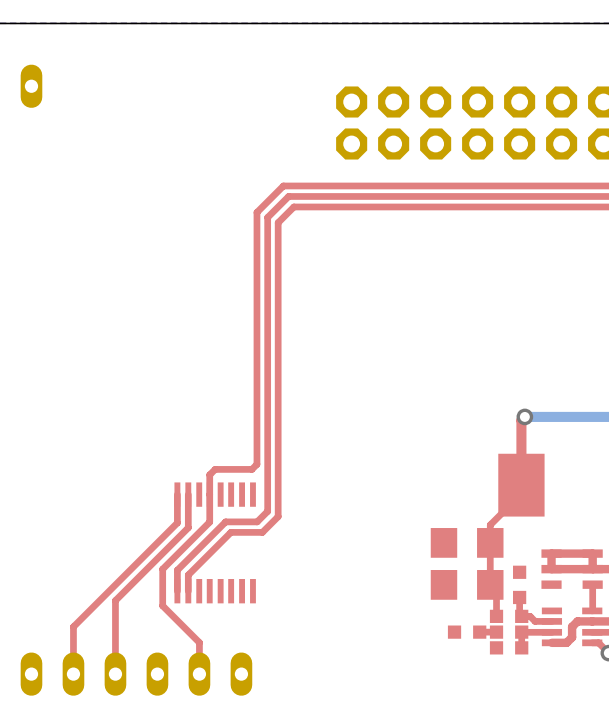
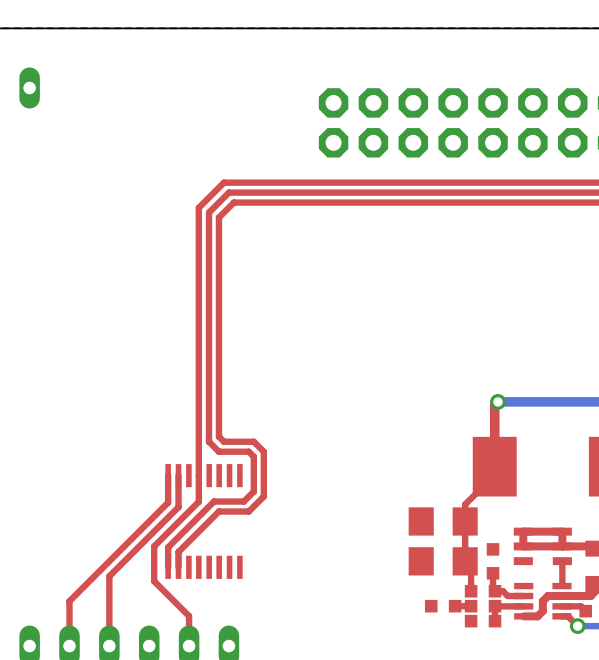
top track: (283, 185) (256, 212) (256, 464) (251, 469) -> (268, 182) (223, 182) (198, 207) (198, 456)
top track: (288, 196) (267, 217) (267, 474) -> (273, 192) (228, 192) (209, 212) (209, 441) (218, 451)
top track: (293, 206) (278, 222) (278, 469) -> (278, 202) (233, 202) (218, 217) (218, 436) (223, 441) (253, 441) (263, 451)
top track: (230, 469) (215, 469) (209, 474) -> none
top track: none -> (238, 451) (248, 451) (253, 456)

